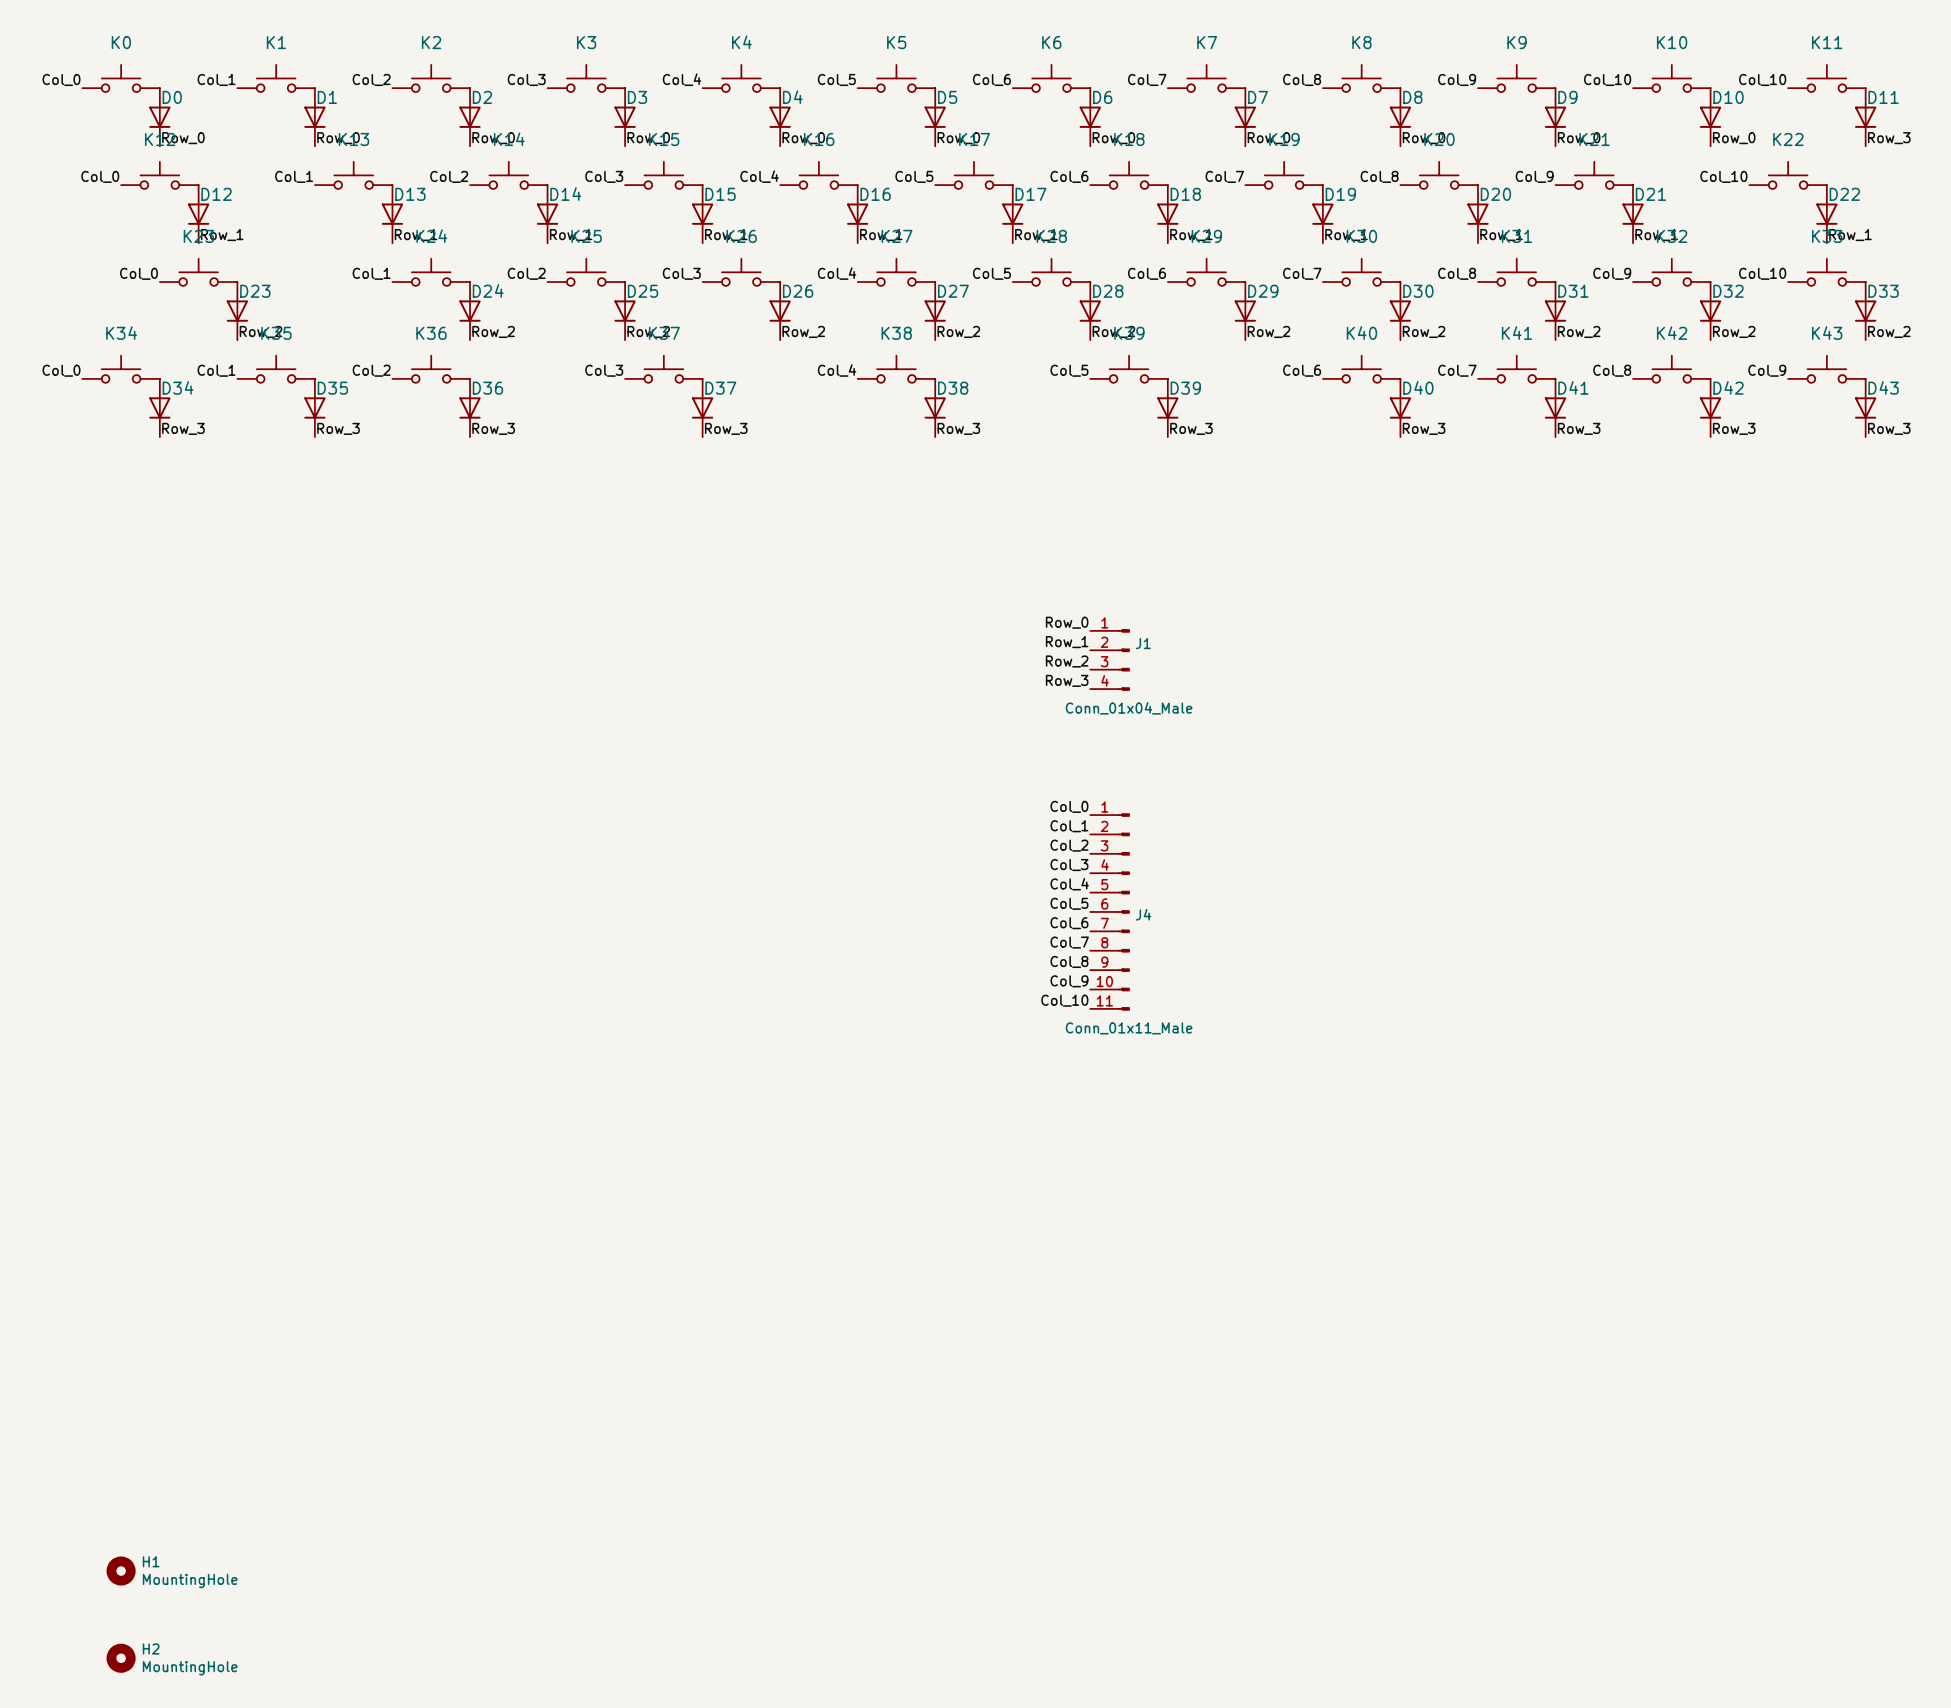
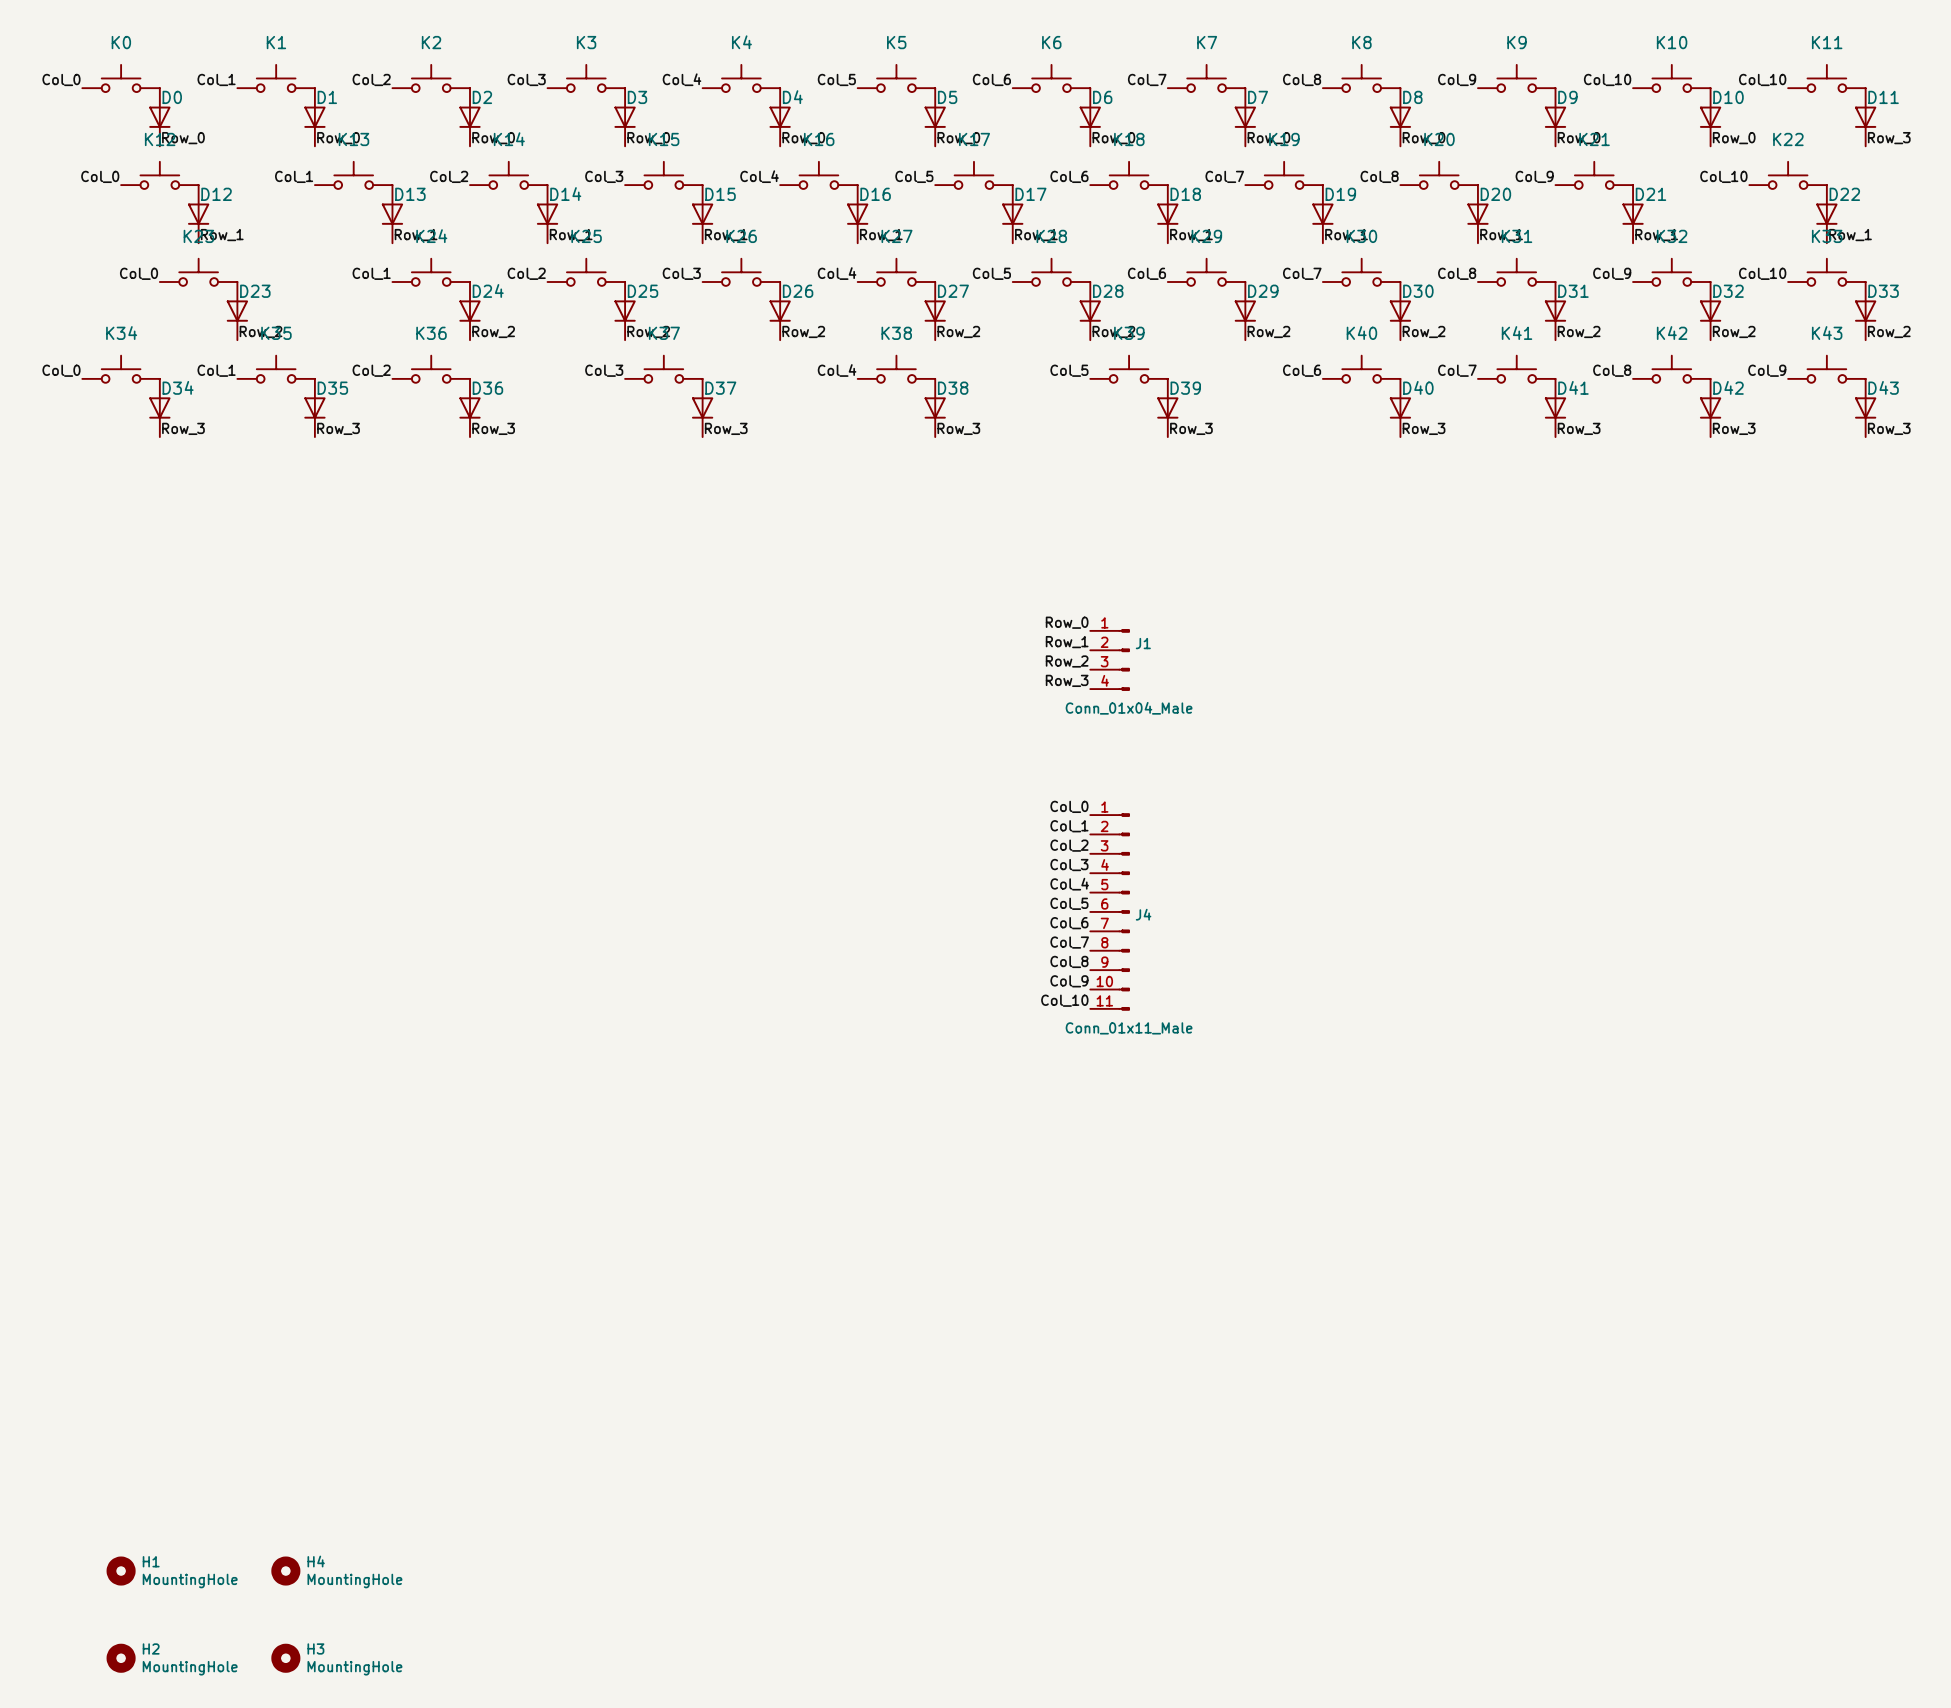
H4: none -> MountingHole (285, 1571)
H3: none -> MountingHole (285, 1658)

